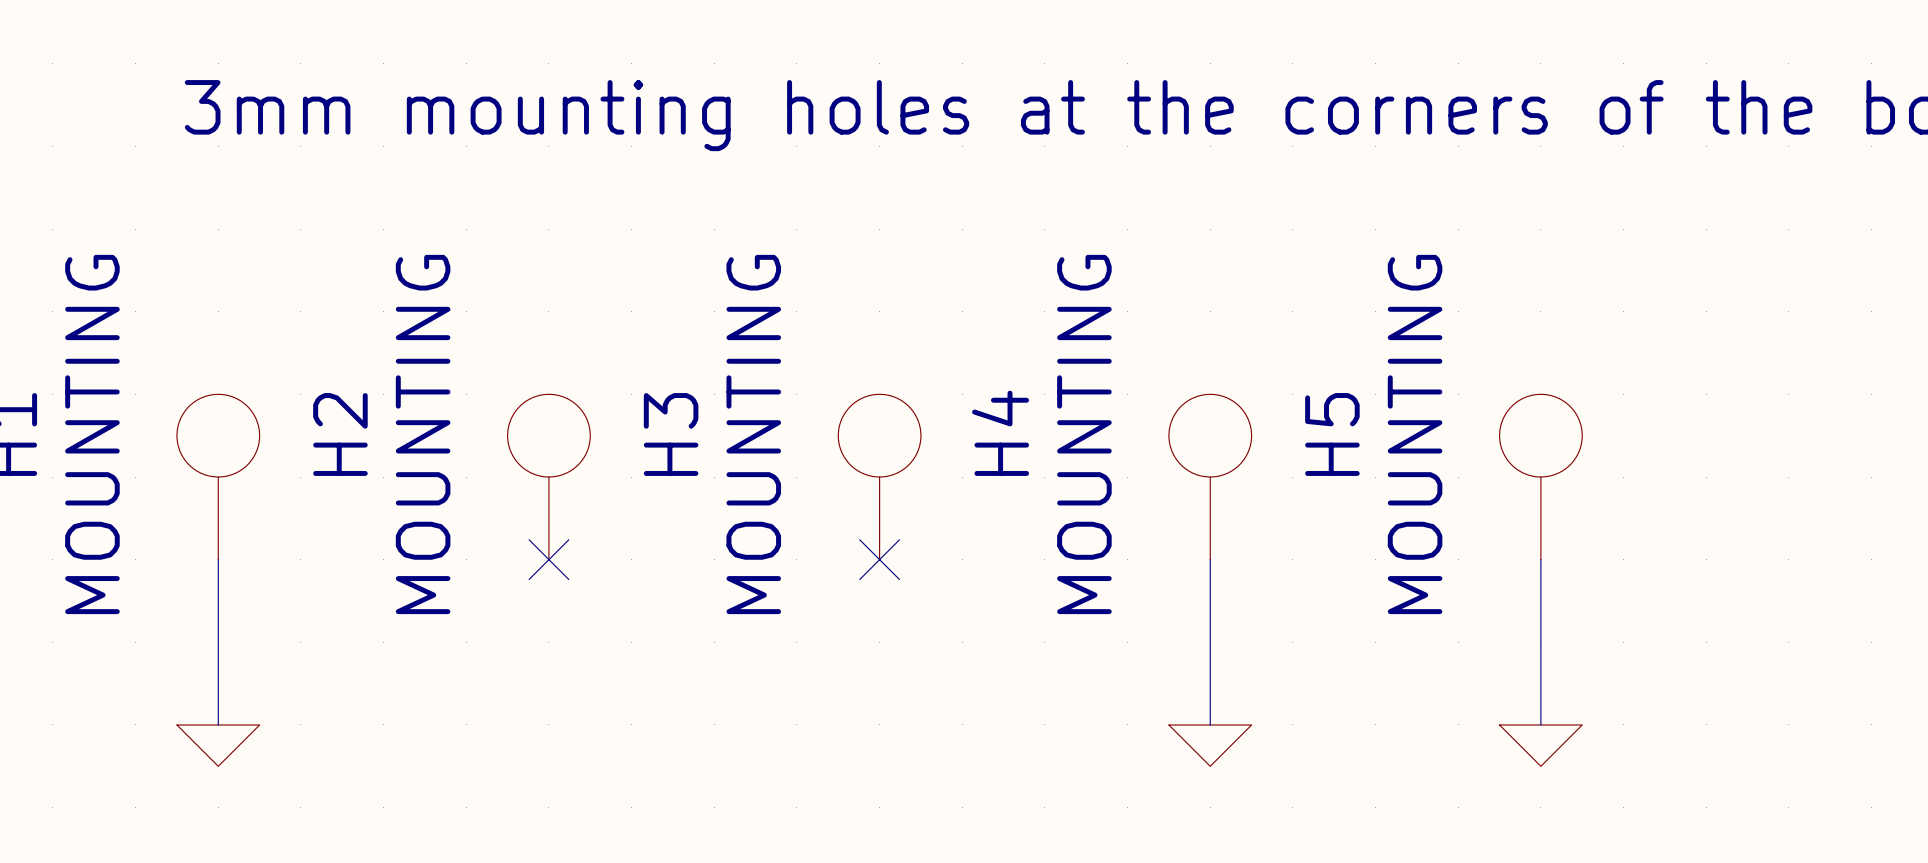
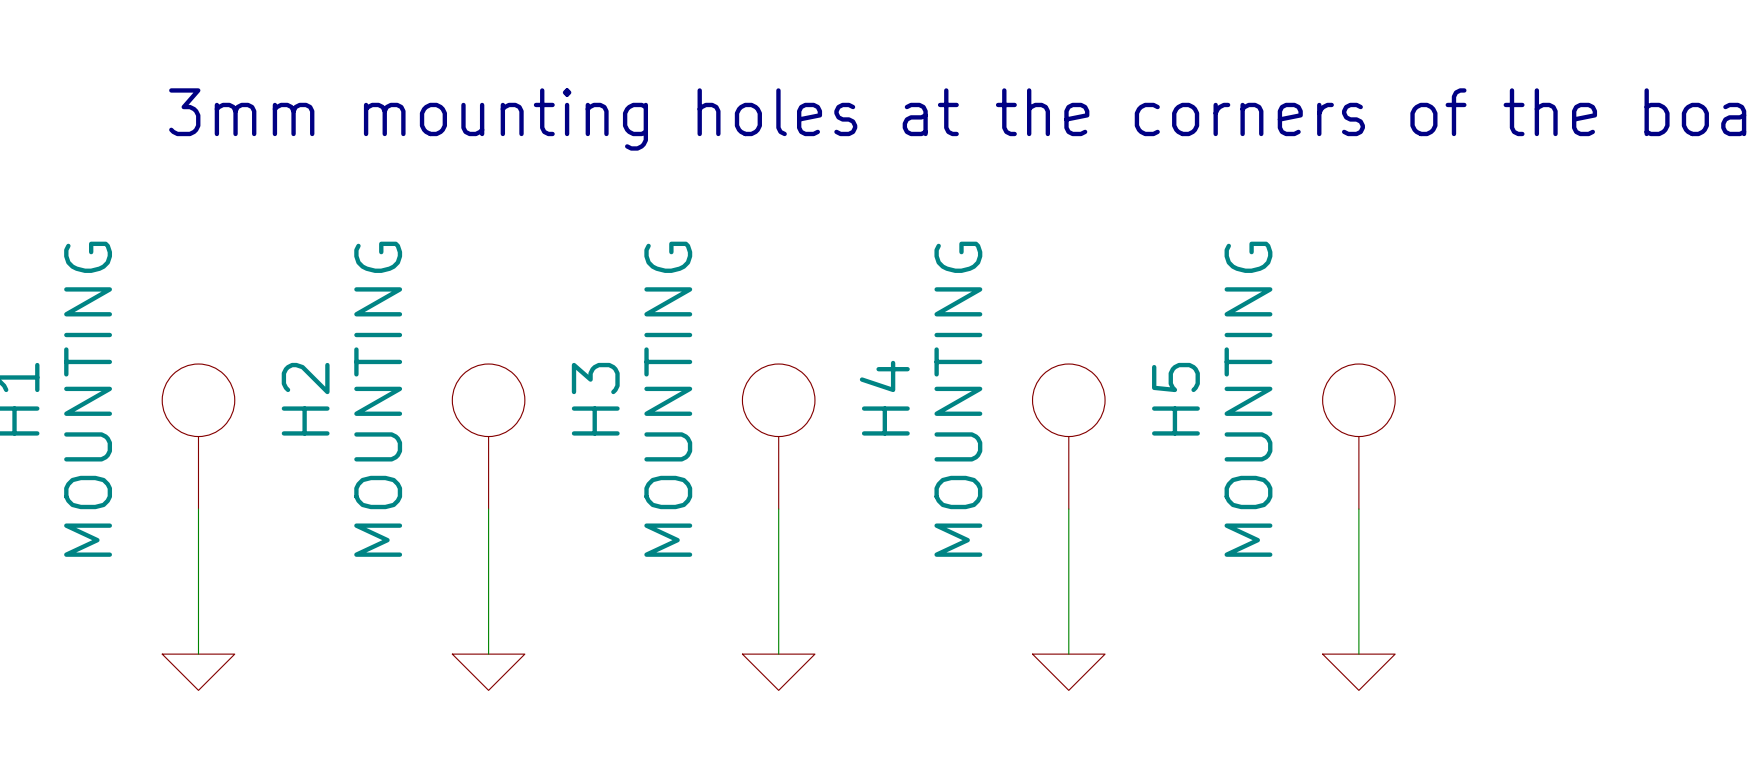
wire: none -> (488, 509) (488, 654)
no-connect mark: (548, 559) -> none
wire: none -> (778, 509) (778, 654)
no-connect mark: (879, 559) -> none
power symbol: none -> (488, 672)
power symbol: none -> (778, 672)

